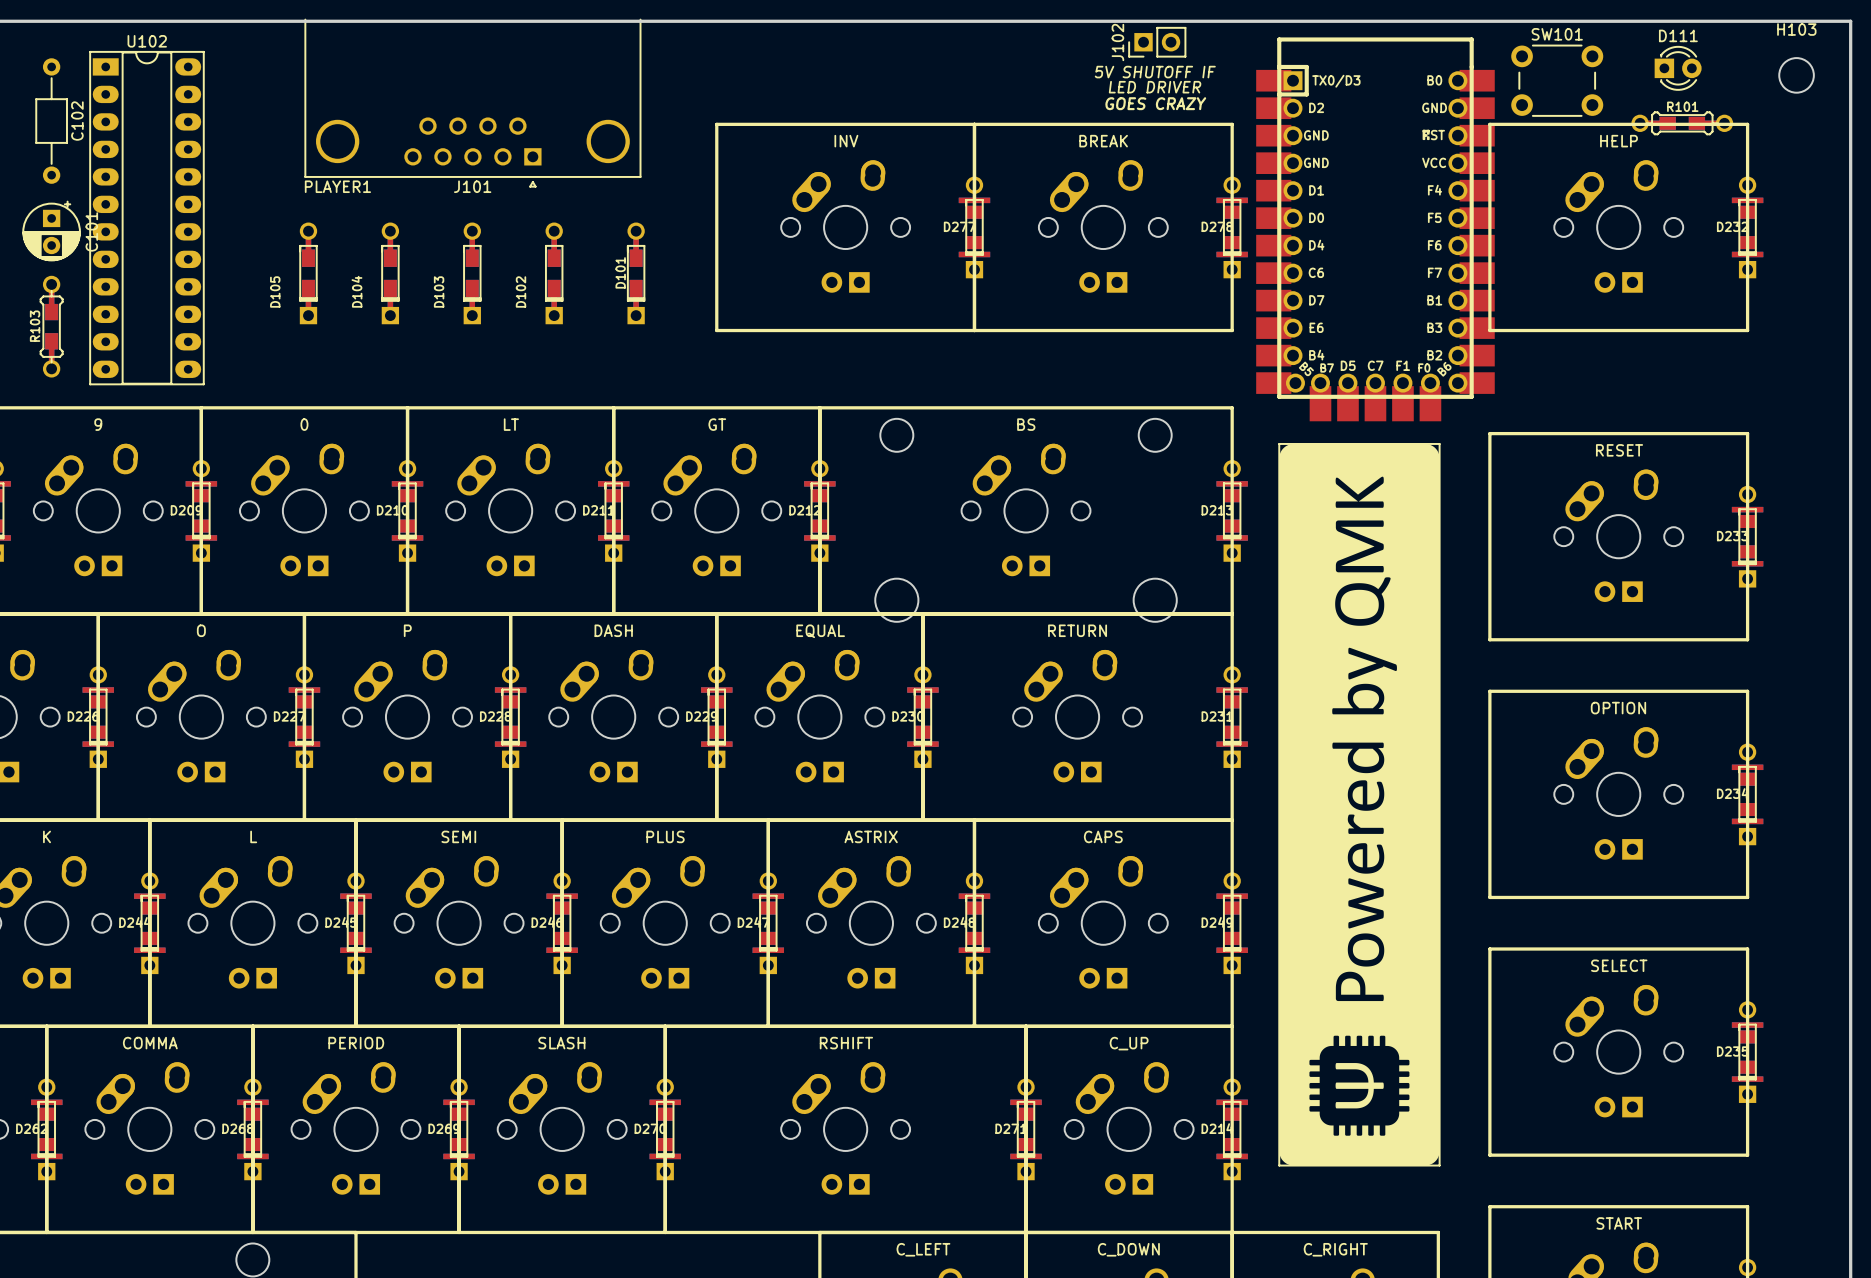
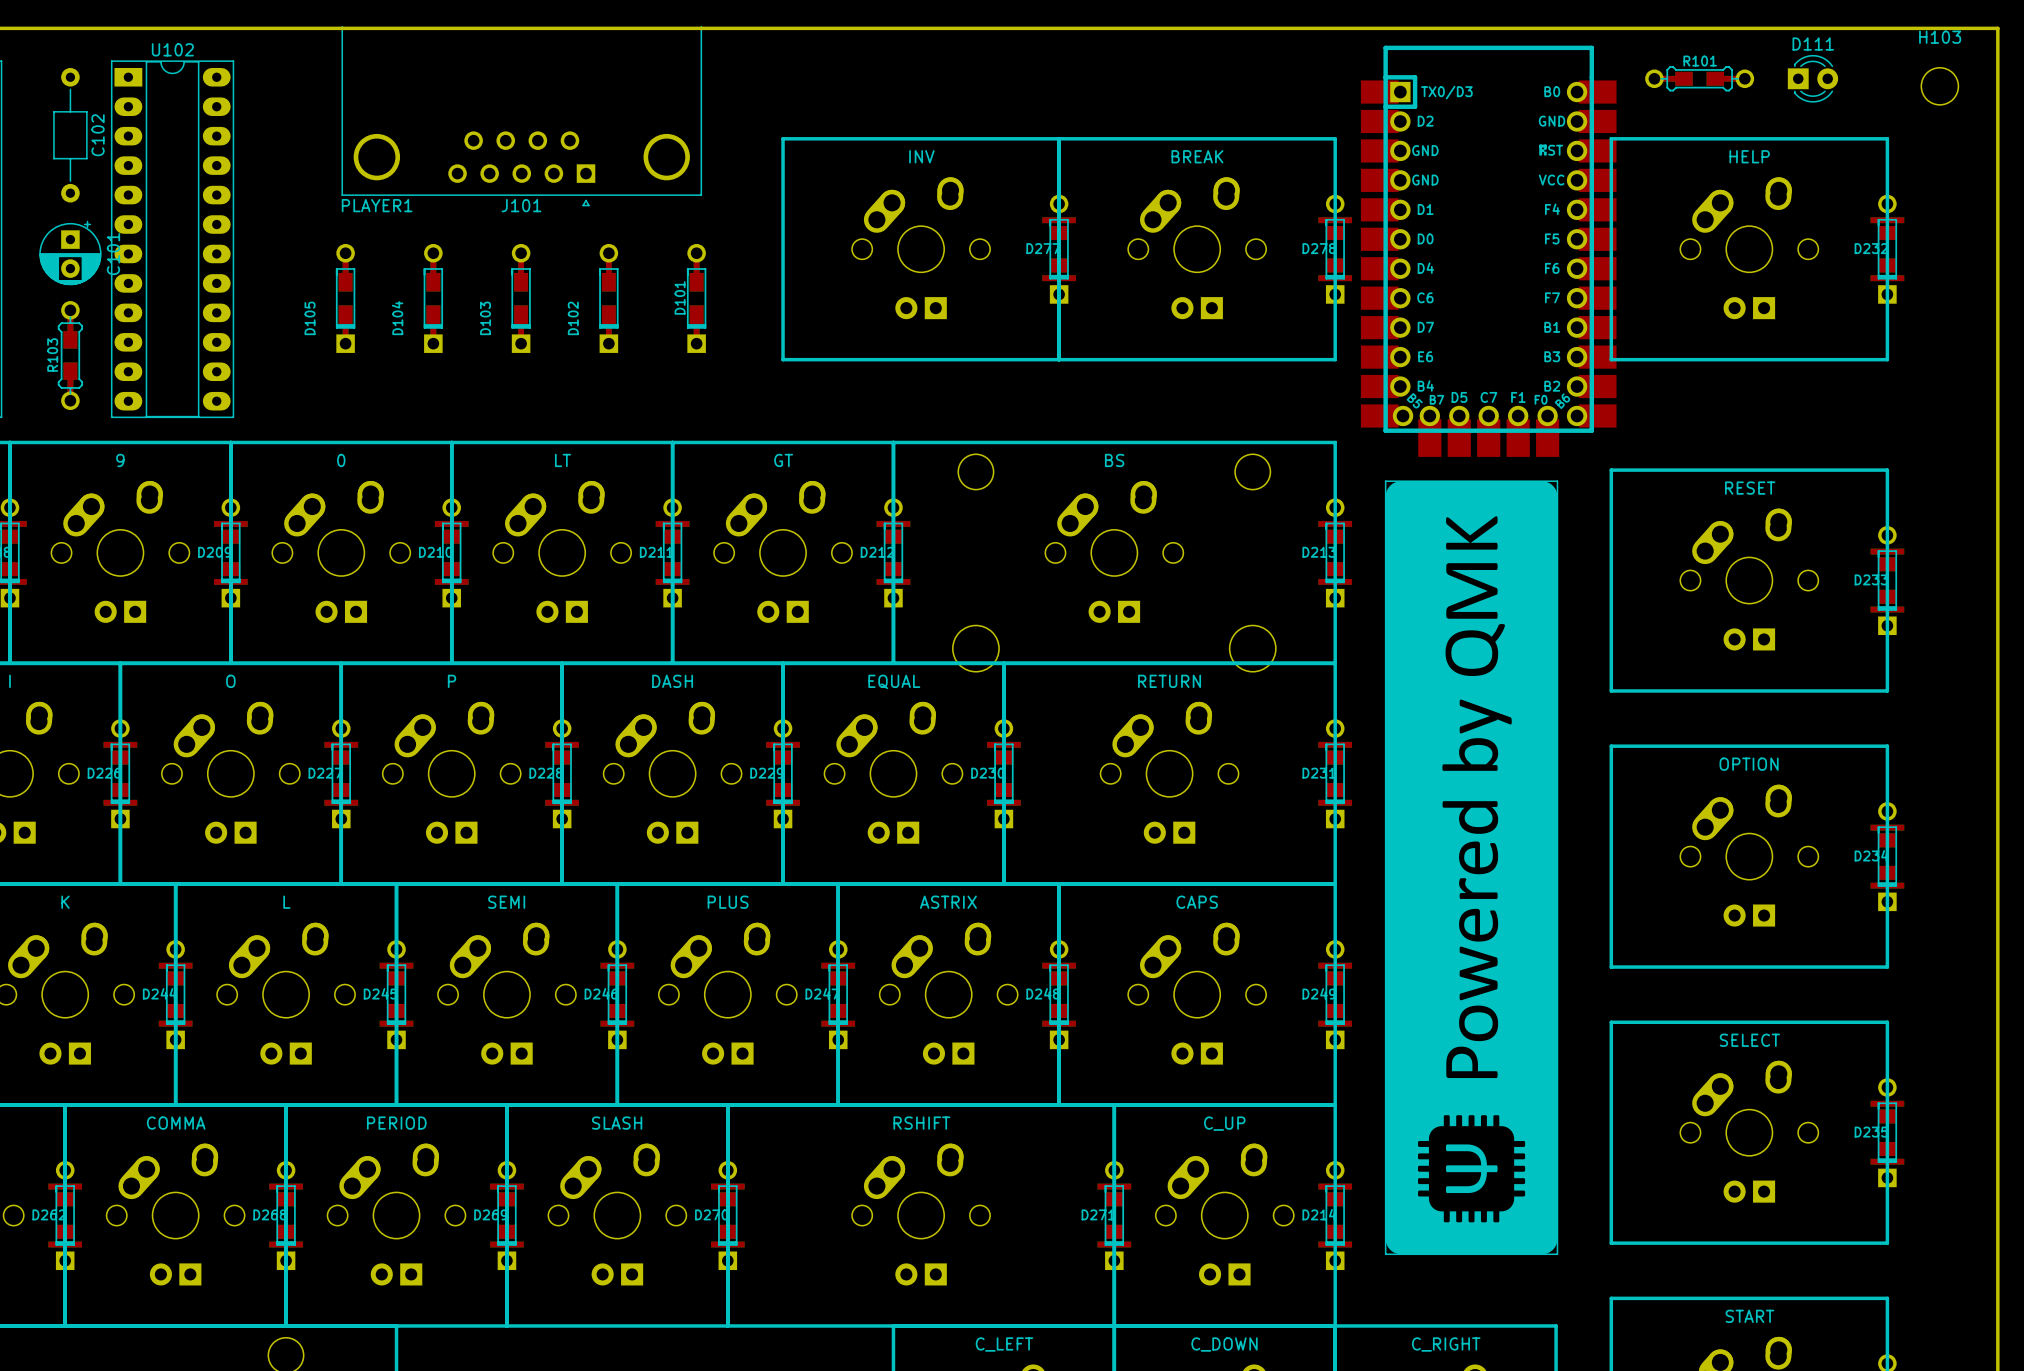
J102: (1157, 42) -> none
SW101: (1557, 80) -> none
R101 position: (1682, 123) -> (1699, 78)

